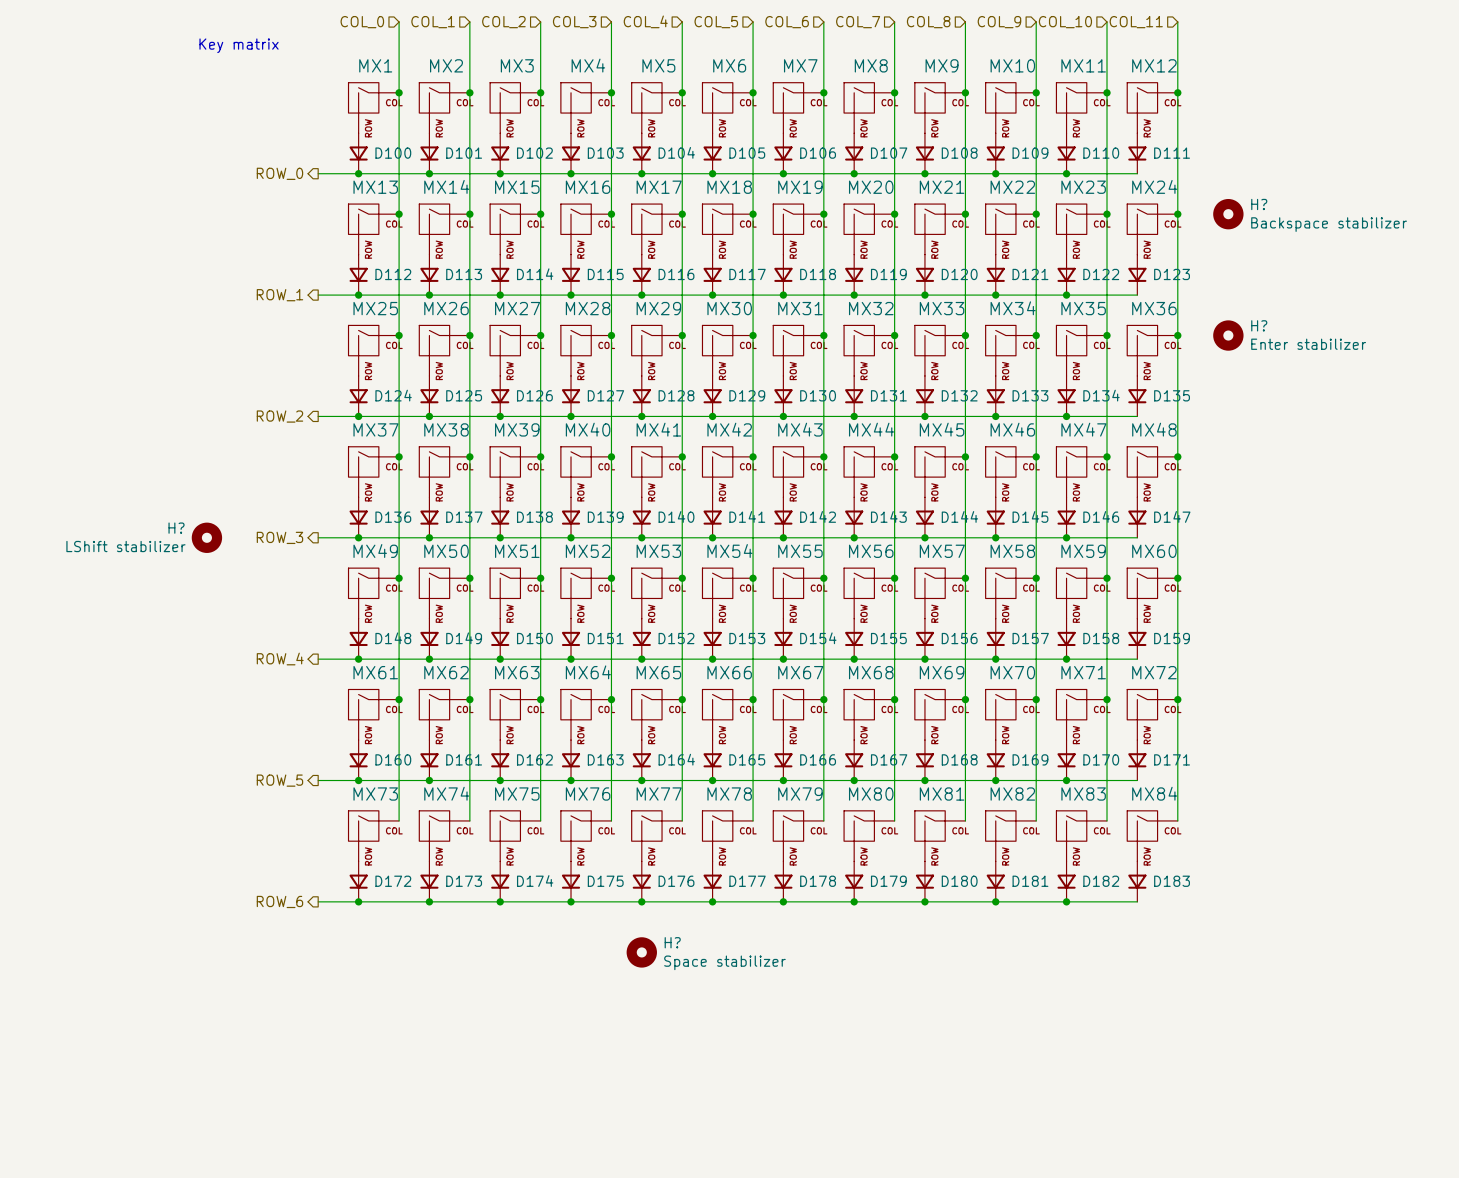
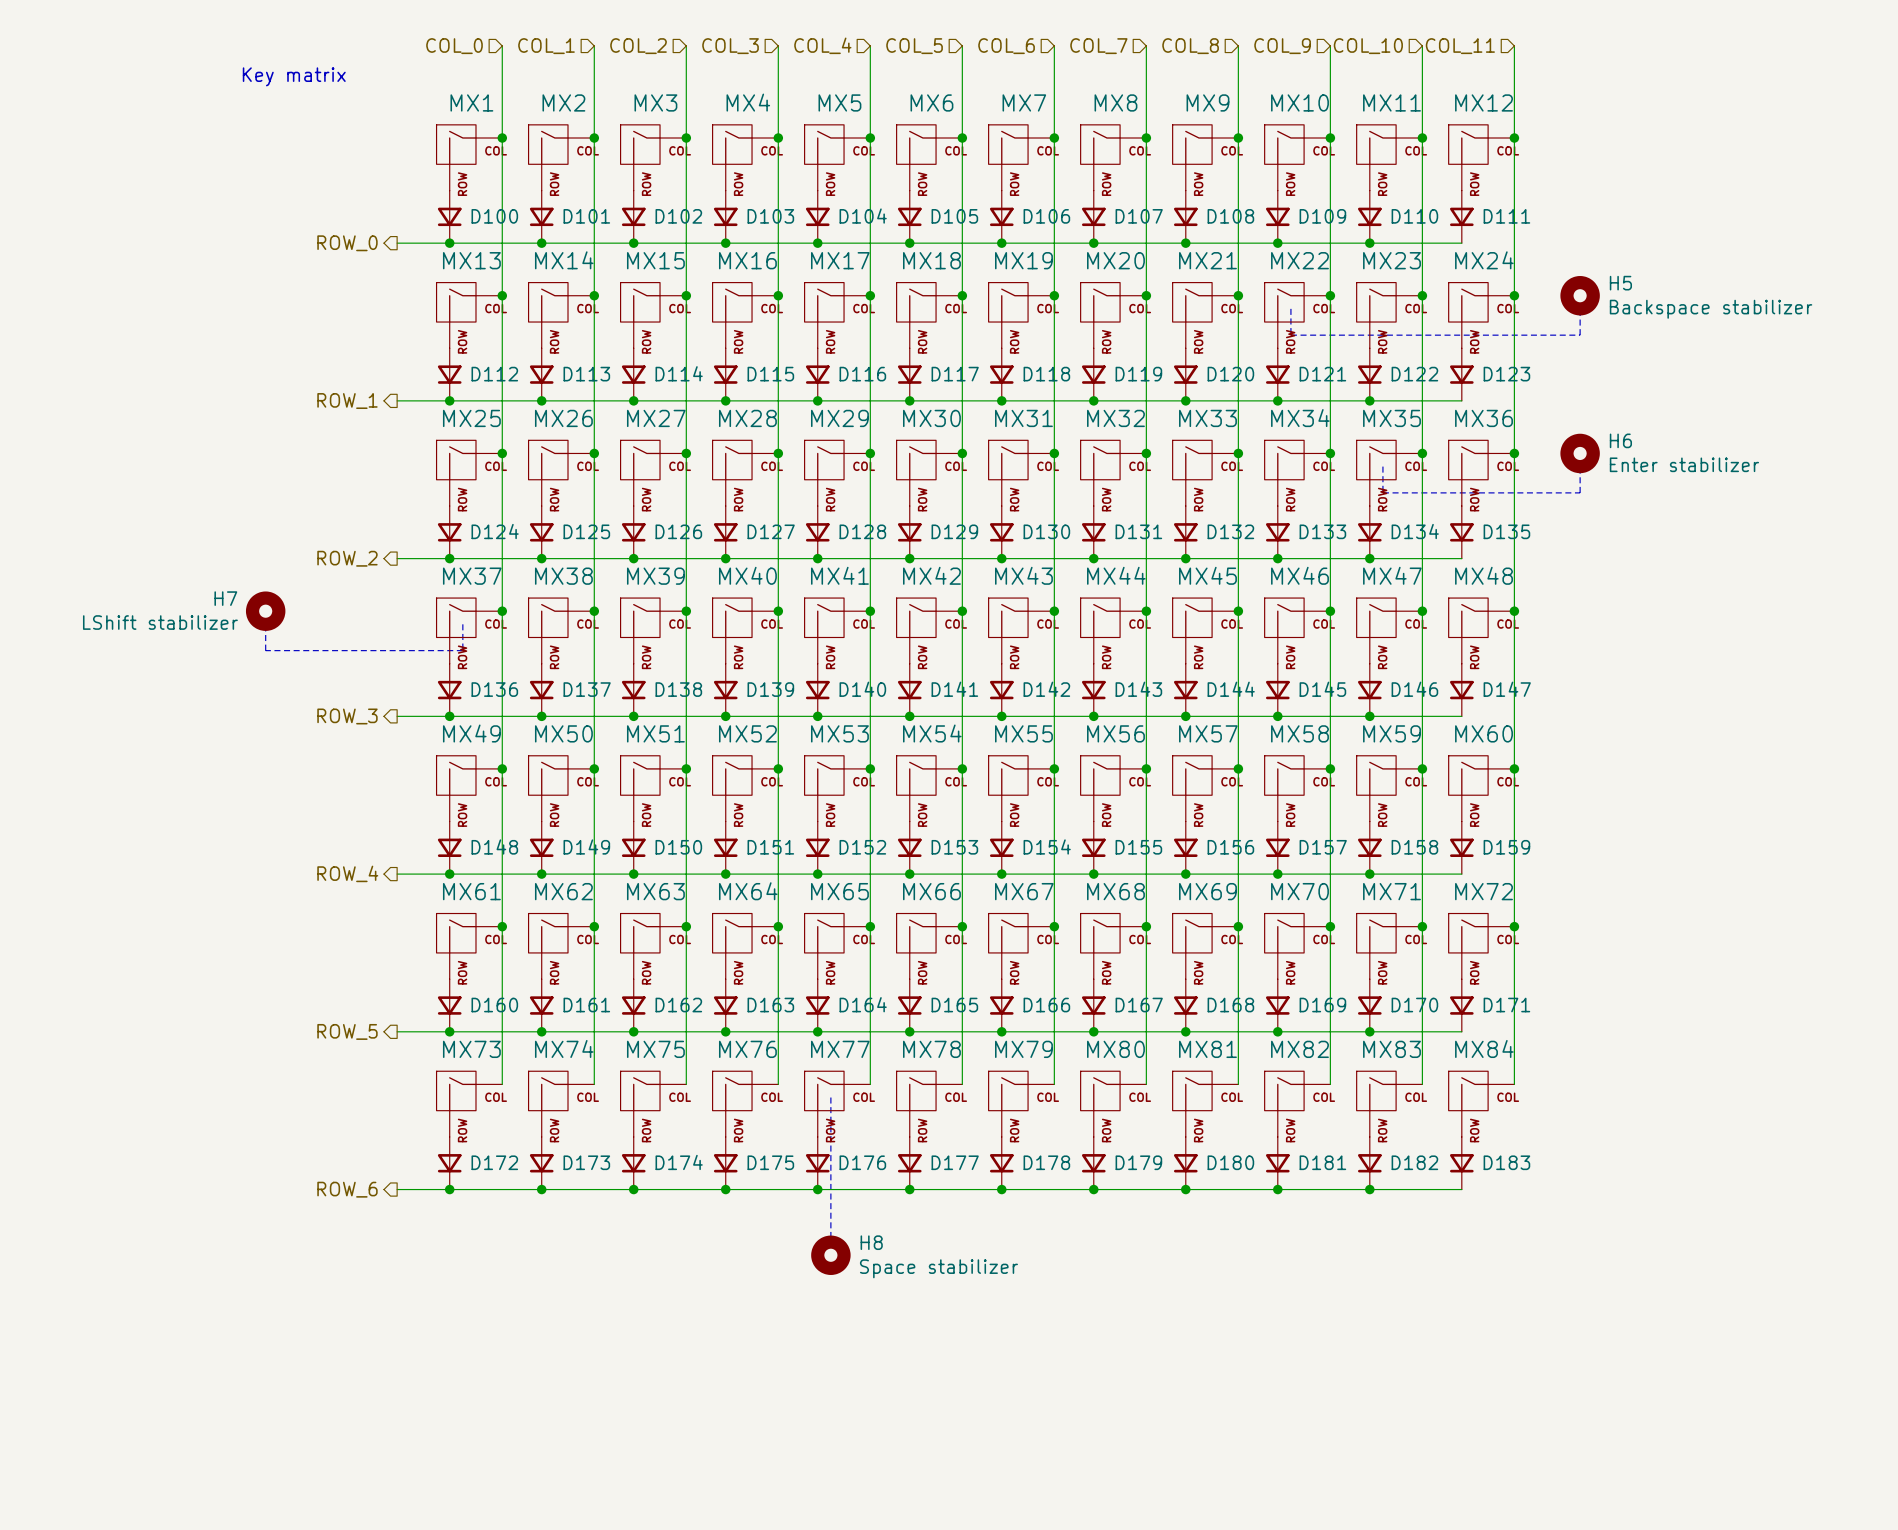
H? name: H? (1259, 204) -> H5 (1620, 283)
line: none -> (1290, 308) (1290, 335) (1580, 335) (1580, 308)
H? name: H? (1259, 325) -> H6 (1620, 440)
line: none -> (1382, 466) (1382, 492) (1580, 492) (1580, 466)
H7: none -> LShift stabilizer (265, 611)
line: none -> (265, 624) (265, 650) (462, 650) (462, 624)
H?: LShift stabilizer (206, 537) -> none
line: none -> (830, 1097) (830, 1242)
H?: Space stabilizer (641, 952) -> none
H8: none -> Space stabilizer (830, 1255)

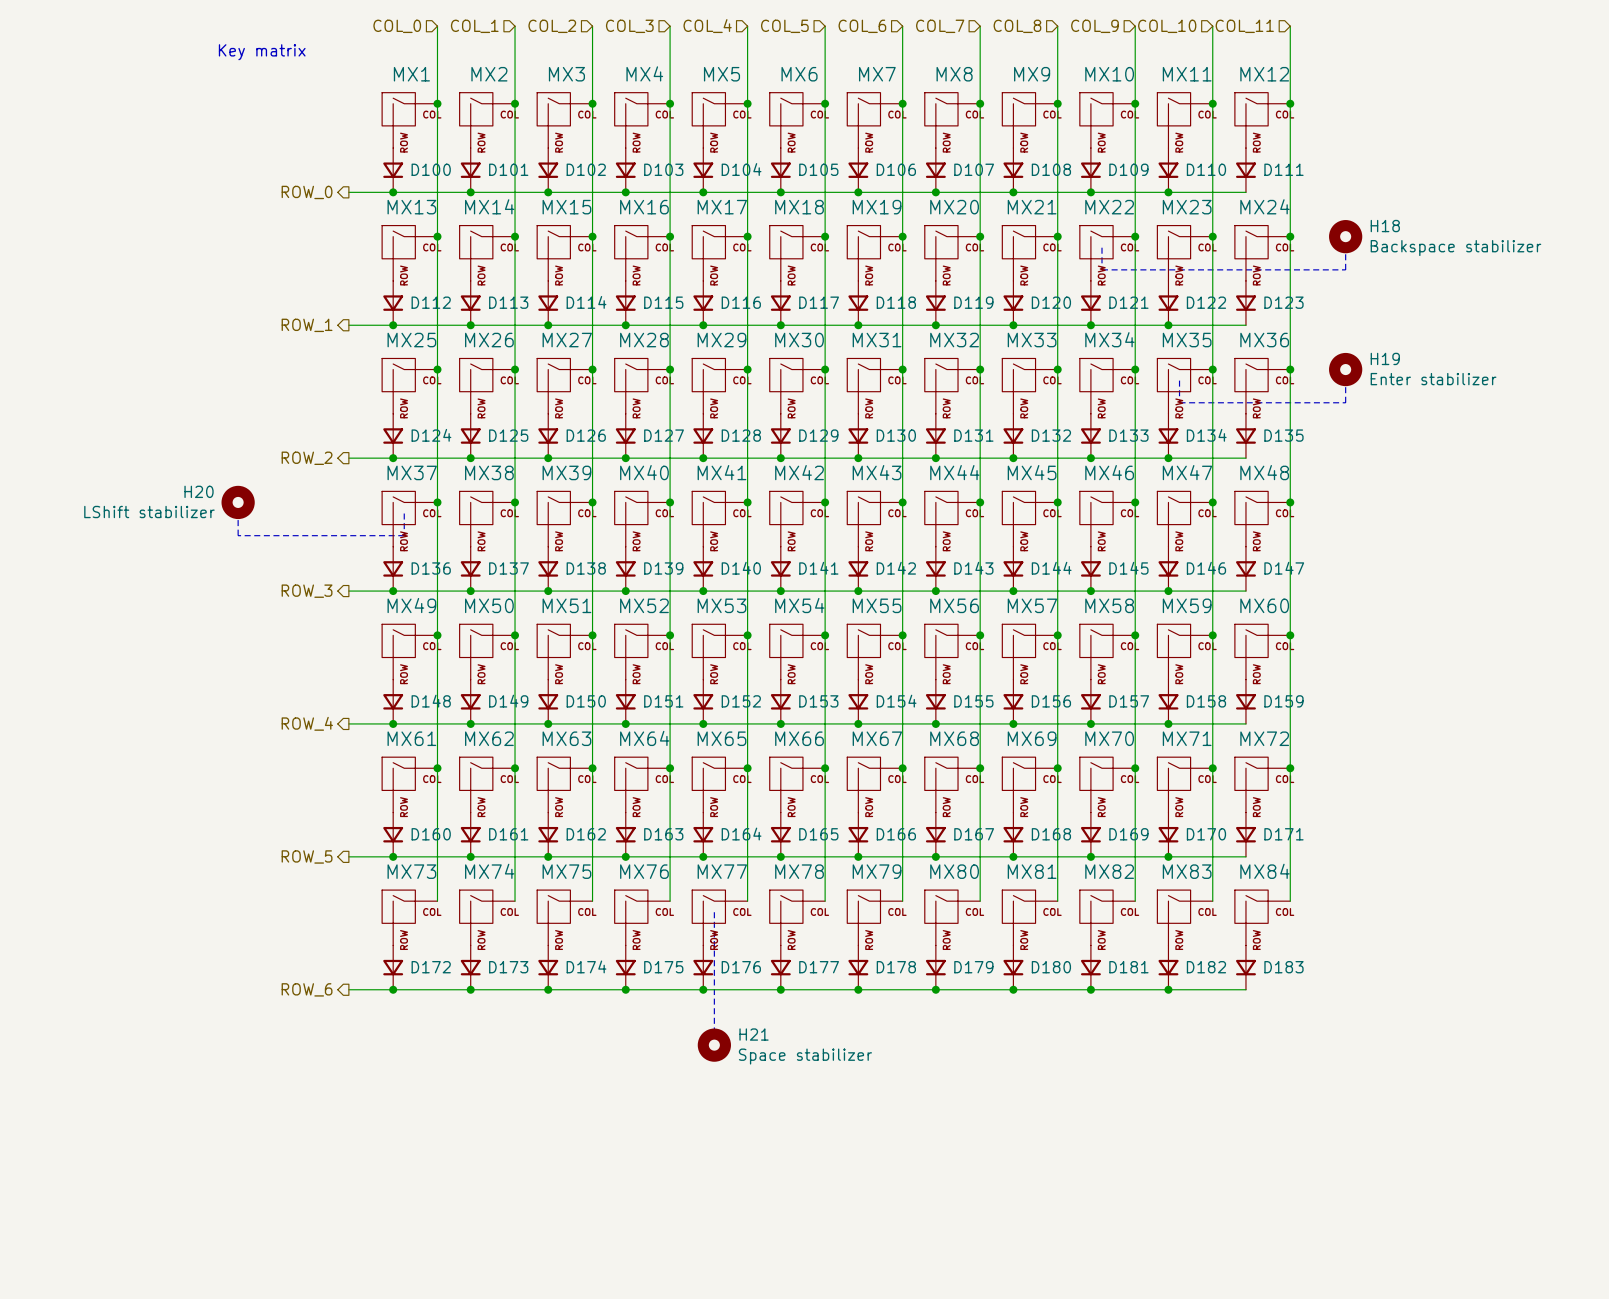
H5 name: H5 (1620, 283) -> H18 (1385, 226)
H6 name: H6 (1620, 440) -> H19 (1385, 358)
H7 name: H7 (225, 598) -> H20 (199, 491)
H8 name: H8 (871, 1242) -> H21 (754, 1034)

